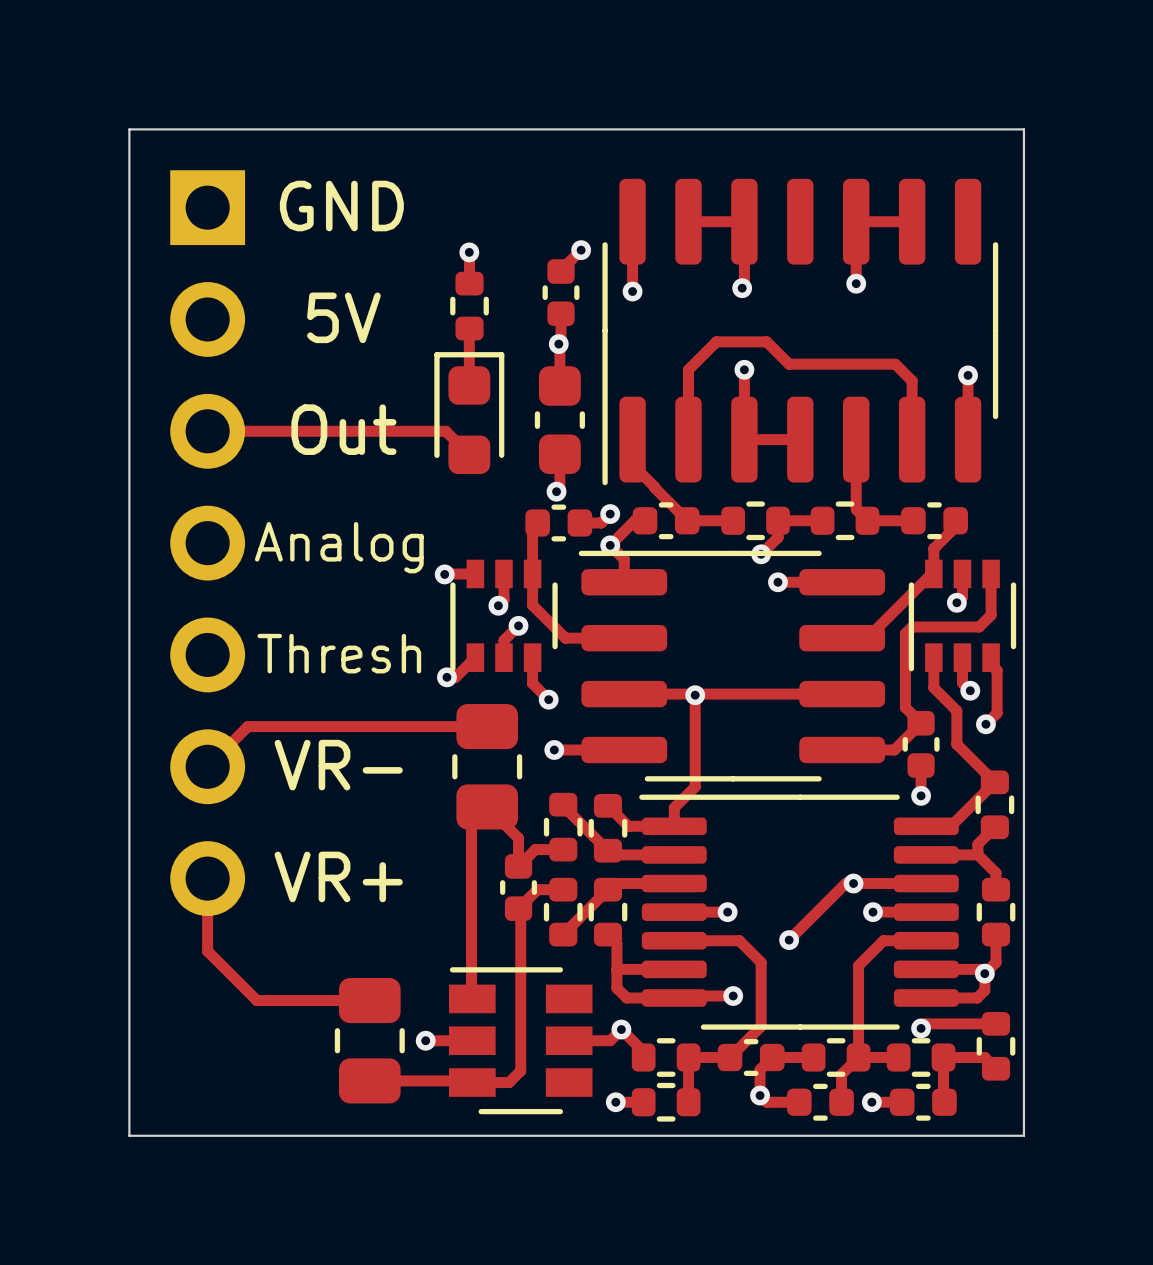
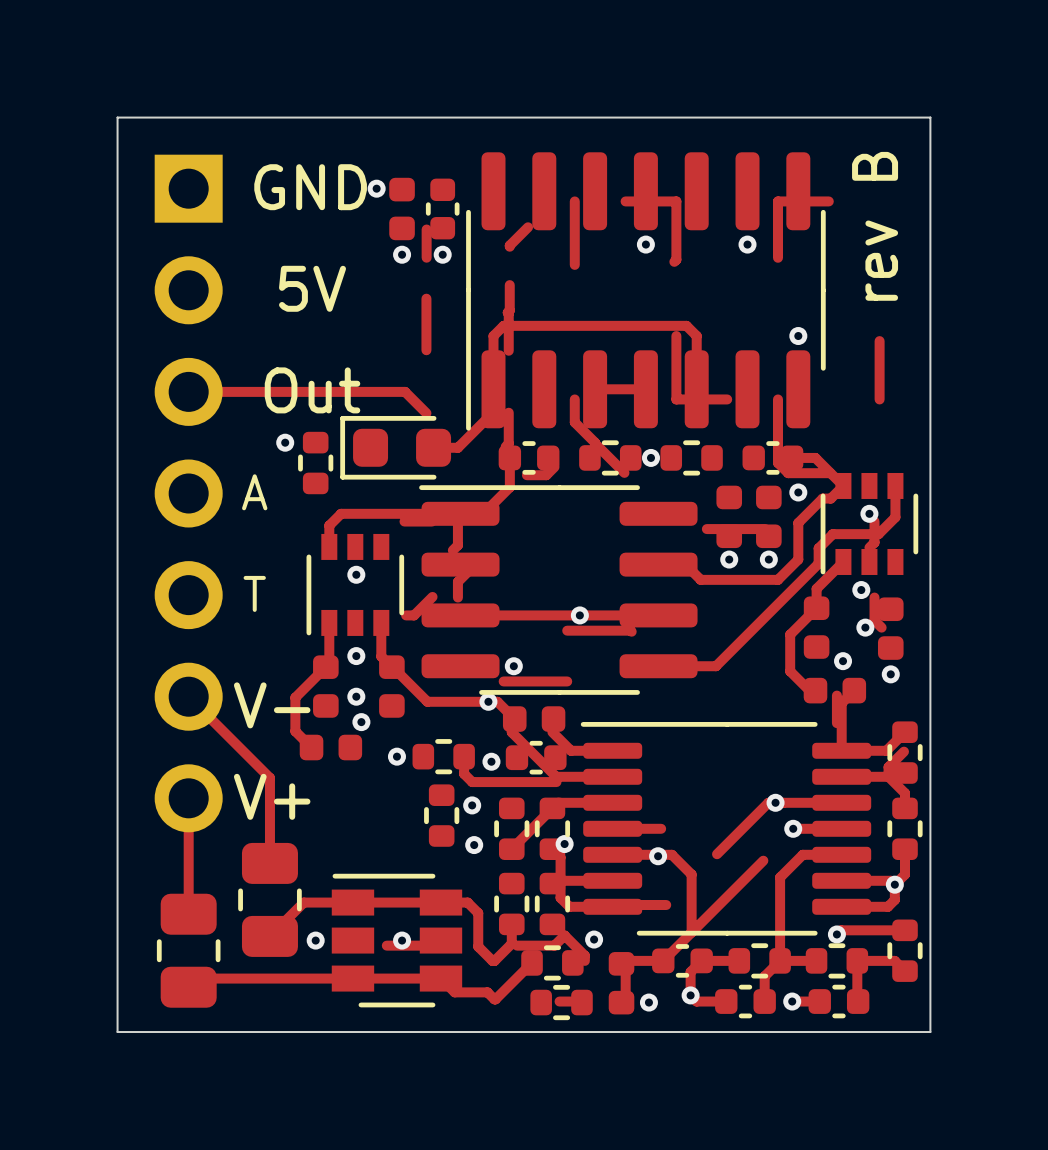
via: none -> (376, 188)
part: none -> (402, 209)
text: none -> rev B (875, 226)
via: (581, 250) -> none
via: (469, 252) -> none
via: none -> (402, 254)
via: none -> (442, 254)
via position: (856, 283) -> (747, 244)
via position: (742, 288) -> (645, 244)
via: (632, 291) -> none
part position: (561, 292) -> (442, 209)
part: (469, 306) -> none
part position: (800, 331) -> (645, 291)
via: (558, 344) -> none
via: (744, 369) -> none
via: none -> (798, 336)
via: (968, 375) -> none
part rotation: 0° (469, 413) -> 90° counterclockwise (395, 447)
part position: (469, 413) -> (395, 447)
part: (559, 420) -> none
track: none -> (595, 389) (645, 389)
track: none -> (696, 389) (696, 336) (686, 325) (503, 325) (493, 336) (493, 412) (457, 447) (433, 447)
track: (688, 439) (688, 369) (716, 341) (766, 341) (789, 364) (895, 364) (912, 380) (912, 439) -> none
via: none -> (285, 442)
via: (556, 491) -> none
part footprint: [810, 501, 880, 541] -> [742, 441, 804, 475]
part footprint: [632, 502, 700, 540] -> [579, 440, 642, 476]
track: none -> (509, 457) (509, 487) (483, 513) (341, 513) (329, 525) (329, 546)
via: none -> (650, 457)
part: none -> (315, 463)
via: (610, 514) -> none
track: (645, 520) (634, 520) (610, 545) (624, 559) (624, 582) -> none
track: (687, 520) (733, 520) -> none
part position: (755, 520) -> (691, 457)
track: (822, 520) (778, 520) (778, 537) (761, 554) -> none
part: (934, 520) -> none
track: (955, 520) (955, 526) (933, 548) (933, 573) (931, 573) (867, 638) (856, 638) -> (792, 457) (815, 457) (843, 485) (830, 498) (822, 498) (798, 522) (798, 559) (777, 579)
track: (537, 523) (532, 528) (532, 605) (565, 638) (624, 638) -> none
part position: (558, 523) -> (529, 457)
track: none -> (895, 485) (895, 517) (878, 534) (832, 534) (818, 548) (818, 563) (716, 666) (658, 666)
text: none -> A (254, 492)
via: none -> (798, 492)
via: (610, 545) -> none
text: Analog (339, 547) -> none
via: (761, 554) -> none
via: none -> (869, 513)
part: none -> (729, 516)
part: none -> (768, 516)
track: (991, 573) (991, 615) (979, 626) (912, 626) (905, 633) (905, 707) (921, 723) (894, 749) (842, 749) -> none
via: (444, 574) -> none
via: (777, 582) -> none
via: (956, 602) -> none
via: (498, 605) -> none
part position: (503, 615) -> (355, 584)
via: none -> (729, 559)
via: none -> (768, 559)
part position: (962, 615) -> (869, 523)
track: none -> (843, 561) (816, 588) (816, 608) (790, 634) (790, 671) (809, 690) (815, 690)
track: none -> (658, 564) (685, 564) (700, 579) (765, 579)
via: (518, 625) -> none
via: none -> (356, 574)
via: none -> (861, 590)
text: none -> T (254, 593)
text: Thresh (339, 653) -> none
track: (532, 657) (532, 683) (548, 699) -> none
track: (933, 657) (933, 687) (956, 710) (956, 744) (994, 782) (950, 826) -> (905, 732) (886, 750) (864, 750)
track: (991, 657) (991, 664) (997, 670) (997, 713) (985, 724) -> none
part position: (731, 666) -> (558, 590)
via: (446, 677) -> none
track: none -> (460, 615) (658, 615)
via: none -> (579, 615)
track: none -> (329, 622) (329, 663) (295, 697) (295, 731) (311, 747)
track: none -> (381, 622) (381, 656) (427, 701) (497, 701) (514, 719)
part: none -> (816, 627)
via position: (970, 690) -> (865, 627)
part: none -> (890, 628)
track: (875, 694) (696, 694) (695, 786) (674, 807) (674, 826) -> none
via: (695, 695) -> none
via: (548, 699) -> none
part footprint: [902, 710, 940, 778] -> [803, 677, 867, 704]
via: none -> (356, 656)
via position: (985, 724) -> (890, 674)
track: (487, 726) (247, 726) (207, 766) -> (269, 863) (269, 777) (188, 696)
via: none -> (843, 661)
via position: (554, 749) -> (513, 666)
part: none -> (325, 686)
part: none -> (391, 686)
track: none -> (854, 690) (841, 703) (841, 750)
text: VR- (338, 765) -> V- (272, 705)
via: none -> (356, 696)
part: (487, 766) -> none
via: none -> (488, 701)
part: none -> (534, 719)
via: none -> (361, 722)
via: (921, 795) -> none
part position: (994, 804) -> (905, 752)
part: none -> (330, 747)
part: (563, 827) -> none
part: (607, 828) -> none
via: none -> (396, 756)
part: none -> (443, 756)
track: none -> (464, 756) (464, 773) (472, 782) (556, 782)
via: none -> (491, 761)
track: (563, 849) (535, 849) (518, 866) (518, 838) (487, 806) (471, 822) (472, 998) -> none
text: VR+ (338, 876) -> V+ (272, 796)
via: none -> (472, 805)
part rotation: 0° (518, 887) -> 90° clockwise (536, 757)
part position: (518, 887) -> (536, 757)
track: (563, 889) (537, 889) (518, 908) (520, 910) (520, 1070) (509, 1082) (369, 1080) -> none
part: none -> (441, 815)
via: (727, 912) -> none
via: none -> (564, 844)
via: none -> (474, 845)
via: (789, 940) -> none
via: none -> (658, 856)
track: (207, 951) (256, 1000) (369, 1000) -> (188, 864) (188, 914)
part: none -> (269, 899)
part: none -> (511, 903)
part: none -> (552, 903)
via: (733, 996) -> none
track: none -> (511, 924) (511, 943) (494, 960) (478, 946) (478, 913) (467, 902) (303, 902) (269, 936)
via position: (621, 1029) -> (594, 939)
via: none -> (315, 940)
part: (369, 1040) -> none
via position: (425, 1040) -> (402, 940)
part position: (520, 1040) -> (396, 940)
part: none -> (188, 950)
part: (666, 1057) -> none
track: none -> (532, 962) (495, 999) (487, 992) (454, 992) (440, 978) (197, 978) (188, 987)
part: none -> (552, 962)
part: none -> (621, 983)
via: (615, 1102) -> none
part: (666, 1102) -> none
part: none -> (561, 1002)
via: none -> (648, 1002)

